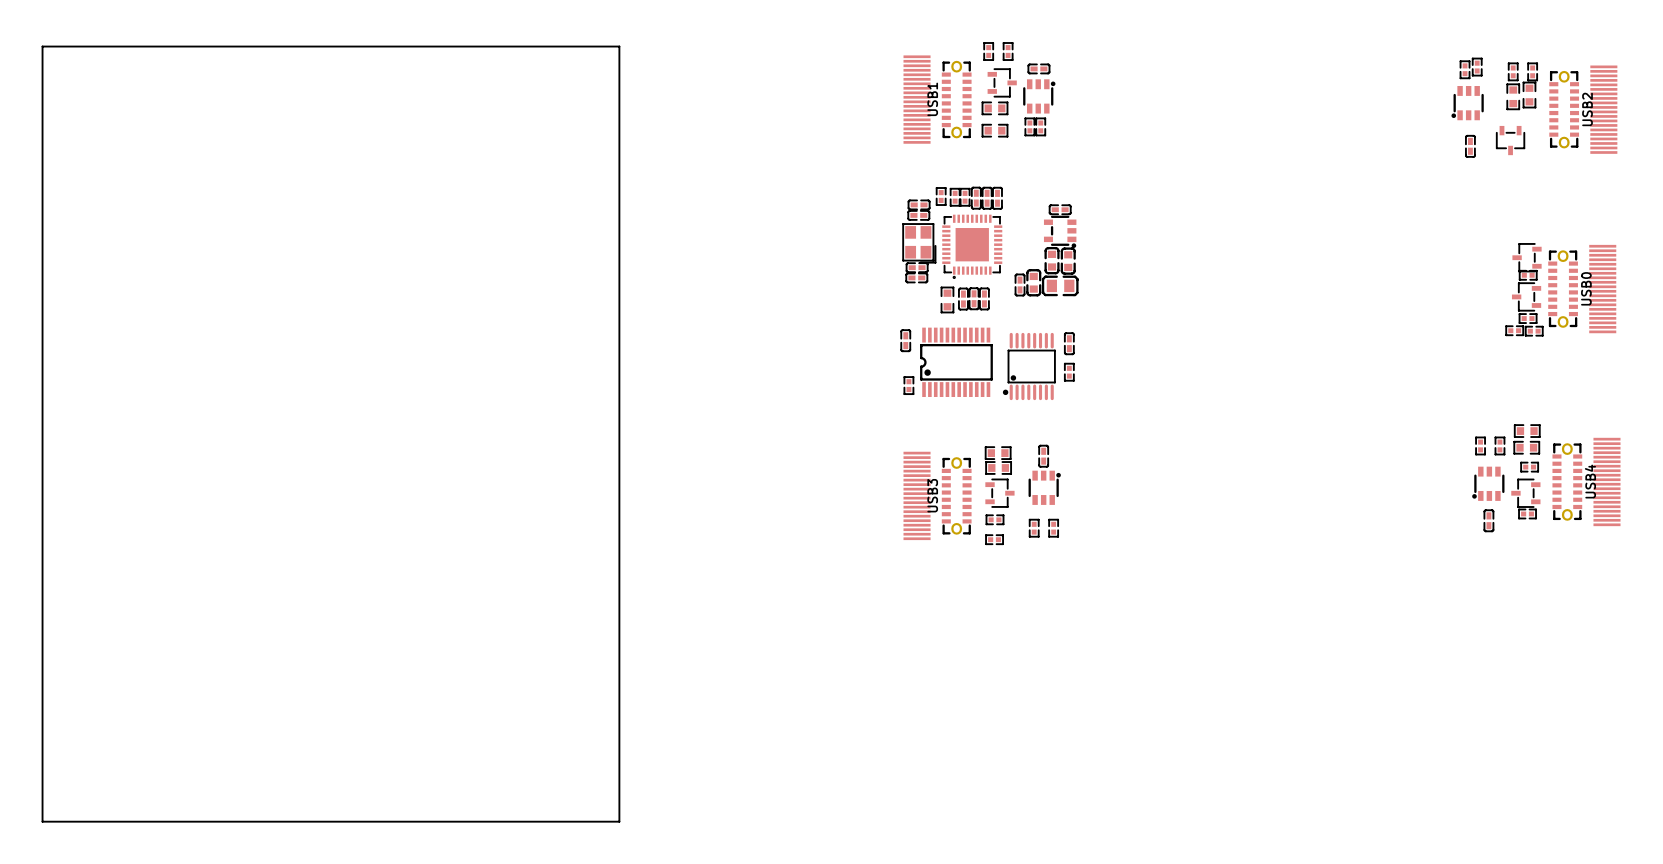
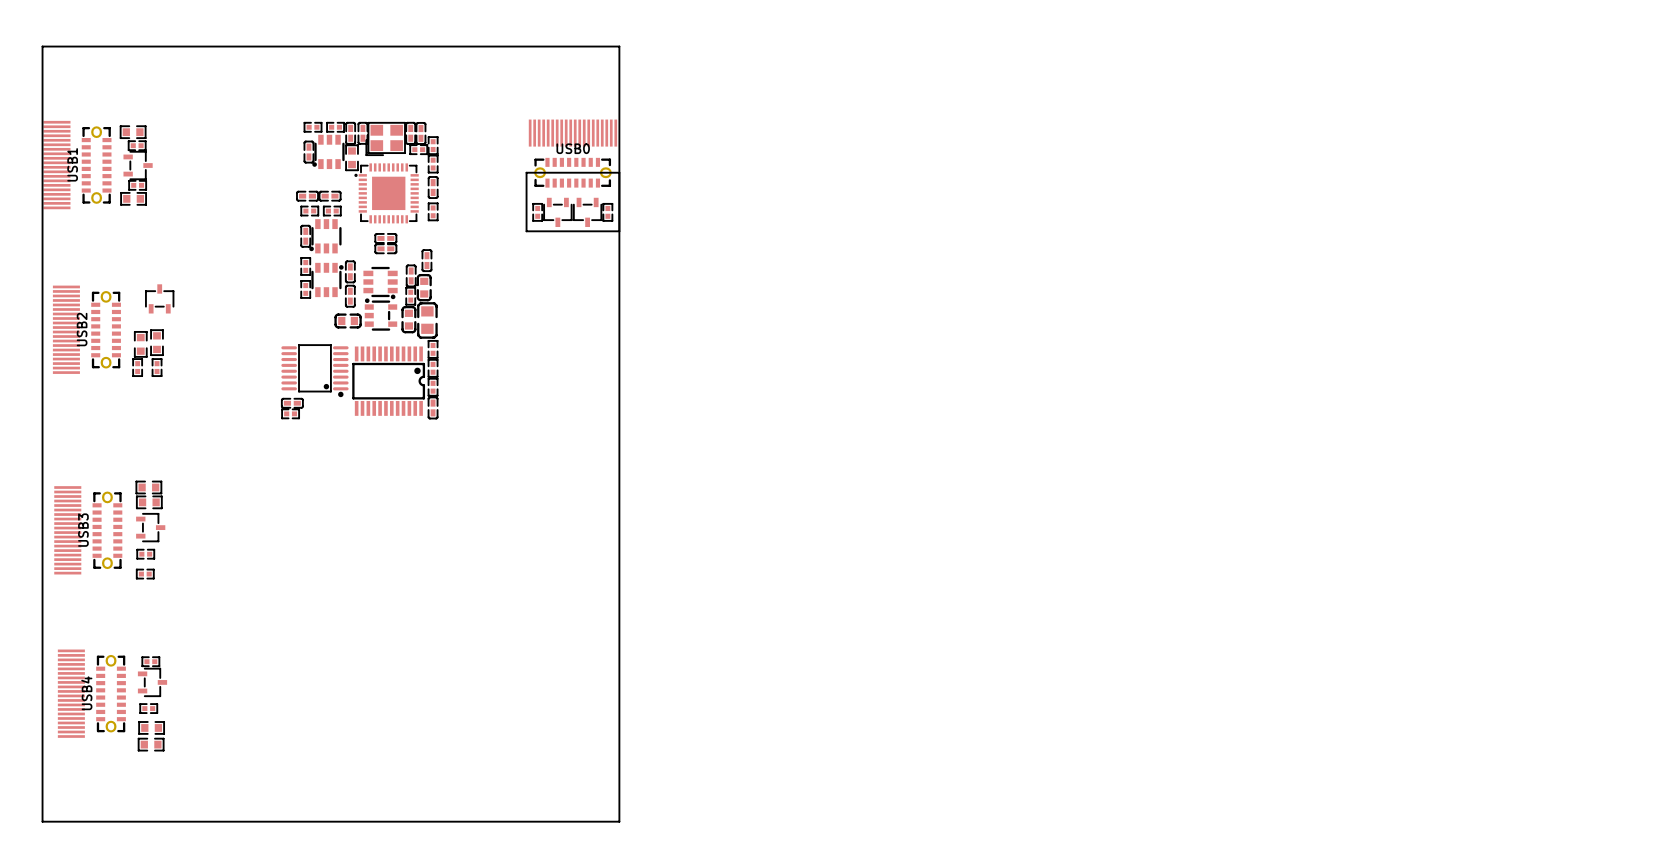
part: (988, 51) -> none
part: (1008, 51) -> none
part: (1477, 67) -> none
part: (1038, 68) -> none
part: (1465, 69) -> none
USB2 footprint: [1549, 70, 1580, 149] -> [91, 291, 121, 369]
part: (1513, 71) -> none
part: (1532, 71) -> none
part: (1002, 82) -> none
part: (1529, 95) -> none
part: (1039, 96) -> none
part: (1513, 96) -> none
part: (917, 99) -> none
USB1 position: (956, 99) -> (96, 165)
part: (1467, 103) -> none
part: (994, 108) -> none
USB2 name position: USB2 (1587, 109) -> USB2 (82, 329)
part: (1603, 109) -> none
part: (1029, 126) -> none
part: (1040, 126) -> none
part: none -> (313, 127)
part: none -> (335, 127)
part: (994, 130) -> none
part: none -> (133, 132)
part: none -> (350, 133)
part: none -> (362, 133)
part: none -> (410, 133)
part: none -> (420, 133)
part: none -> (572, 133)
part: none -> (385, 138)
part: (1510, 140) -> none
part: none -> (137, 145)
part: none -> (433, 145)
part: (1470, 146) -> none
part: none -> (418, 149)
part: none -> (328, 151)
part: none -> (308, 152)
part: none -> (352, 157)
part: none -> (433, 164)
part: none -> (56, 165)
part: none -> (138, 165)
line: none -> (526, 172) (619, 172) (619, 231) (526, 231) (526, 172)
part: none -> (137, 185)
part: none -> (433, 187)
part: none -> (386, 193)
part: none -> (307, 196)
part: none -> (330, 196)
part: (941, 196) -> none
part: (955, 197) -> none
part: (965, 197) -> none
part: none -> (133, 198)
part: (976, 198) -> none
part: (987, 198) -> none
part: (997, 198) -> none
part: (919, 204) -> none
part: (1060, 209) -> none
part: none -> (309, 211)
part: none -> (332, 211)
part: none -> (433, 211)
part: none -> (537, 212)
part: none -> (557, 212)
part: none -> (587, 212)
part: none -> (607, 212)
part: (918, 215) -> none
part: (1060, 231) -> none
part: none -> (305, 236)
part: none -> (325, 236)
part: none -> (385, 238)
part: (919, 243) -> none
part: (972, 246) -> none
part: none -> (385, 248)
part: (1527, 257) -> none
part: none -> (426, 260)
part: (1052, 260) -> none
part: (1068, 261) -> none
part: none -> (305, 266)
part: (917, 267) -> none
part: none -> (350, 271)
part: none -> (411, 275)
part: (1528, 275) -> none
part: (916, 277) -> none
part: none -> (327, 279)
part: (1033, 282) -> none
part: none -> (380, 283)
part: (1020, 285) -> none
part: (1060, 285) -> none
part: none -> (424, 287)
part: none -> (305, 289)
USB0 rotation: 0° (1563, 289) -> 90° counterclockwise (572, 172)
USB0 position: (1563, 289) -> (572, 172)
part: (1602, 289) -> none
part: none -> (350, 296)
part: none -> (410, 296)
part: (1526, 296) -> none
part: none -> (159, 298)
part: (974, 298) -> none
part: (984, 298) -> none
part: (947, 299) -> none
part: (963, 299) -> none
part: none -> (380, 314)
part: (1528, 318) -> none
part: none -> (408, 319)
part: none -> (348, 320)
part: none -> (427, 320)
part: none -> (66, 329)
part: (1514, 330) -> none
part: (1534, 331) -> none
part: (905, 340) -> none
part: none -> (157, 342)
part: (1069, 343) -> none
part: none -> (140, 344)
part: none -> (433, 349)
part: (956, 362) -> none
part: (1029, 366) -> none
part: none -> (137, 367)
part: none -> (157, 367)
part: none -> (433, 368)
part: none -> (314, 370)
part: (1069, 372) -> none
part: none -> (388, 381)
part: (908, 385) -> none
part: none -> (433, 387)
part: none -> (292, 403)
part: none -> (433, 407)
part: none -> (290, 413)
part: (1527, 431) -> none
part: (1480, 445) -> none
part: (1499, 445) -> none
part: (1526, 447) -> none
part: (998, 453) -> none
part: (1043, 456) -> none
part: (998, 467) -> none
part: (1529, 467) -> none
USB4 rotation: 0° (1567, 481) -> 180° (111, 693)
USB4 position: (1567, 481) -> (111, 693)
part: (1606, 481) -> none
part: (1488, 483) -> none
part: none -> (148, 487)
part: (1044, 487) -> none
part: (999, 493) -> none
part: (1525, 493) -> none
part: (917, 495) -> none
USB3 position: (956, 495) -> (107, 530)
part: none -> (149, 502)
part: (1527, 513) -> none
part: (994, 519) -> none
part: (1488, 520) -> none
part: none -> (150, 527)
part: (1034, 528) -> none
part: (1053, 528) -> none
part: none -> (67, 530)
part: (994, 539) -> none
part: none -> (145, 554)
part: none -> (145, 574)
part: none -> (150, 661)
part: none -> (152, 682)
part: none -> (71, 693)
part: none -> (148, 708)
part: none -> (151, 727)
part: none -> (151, 744)

